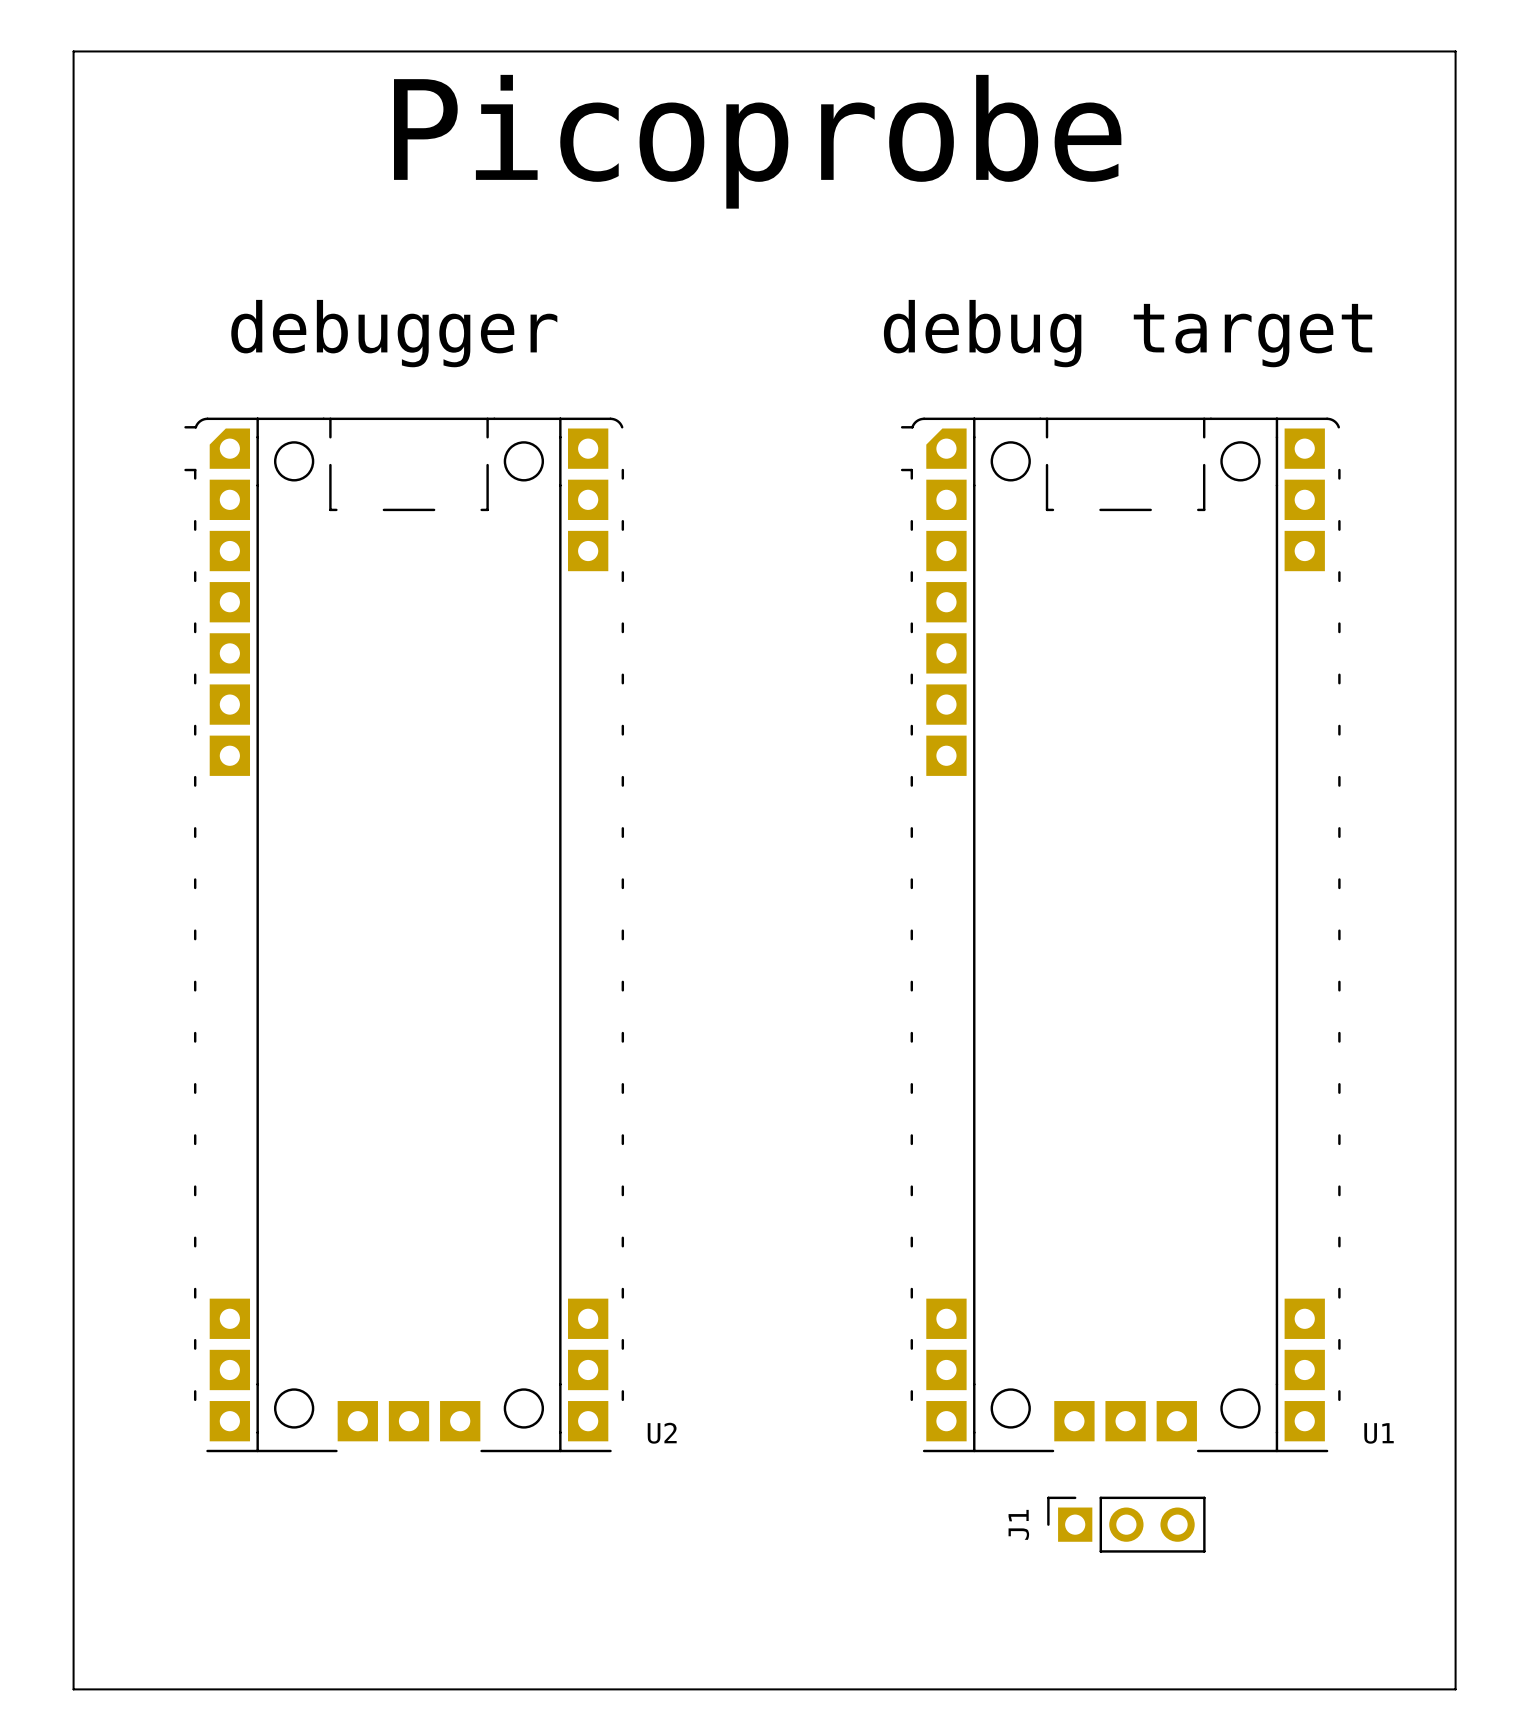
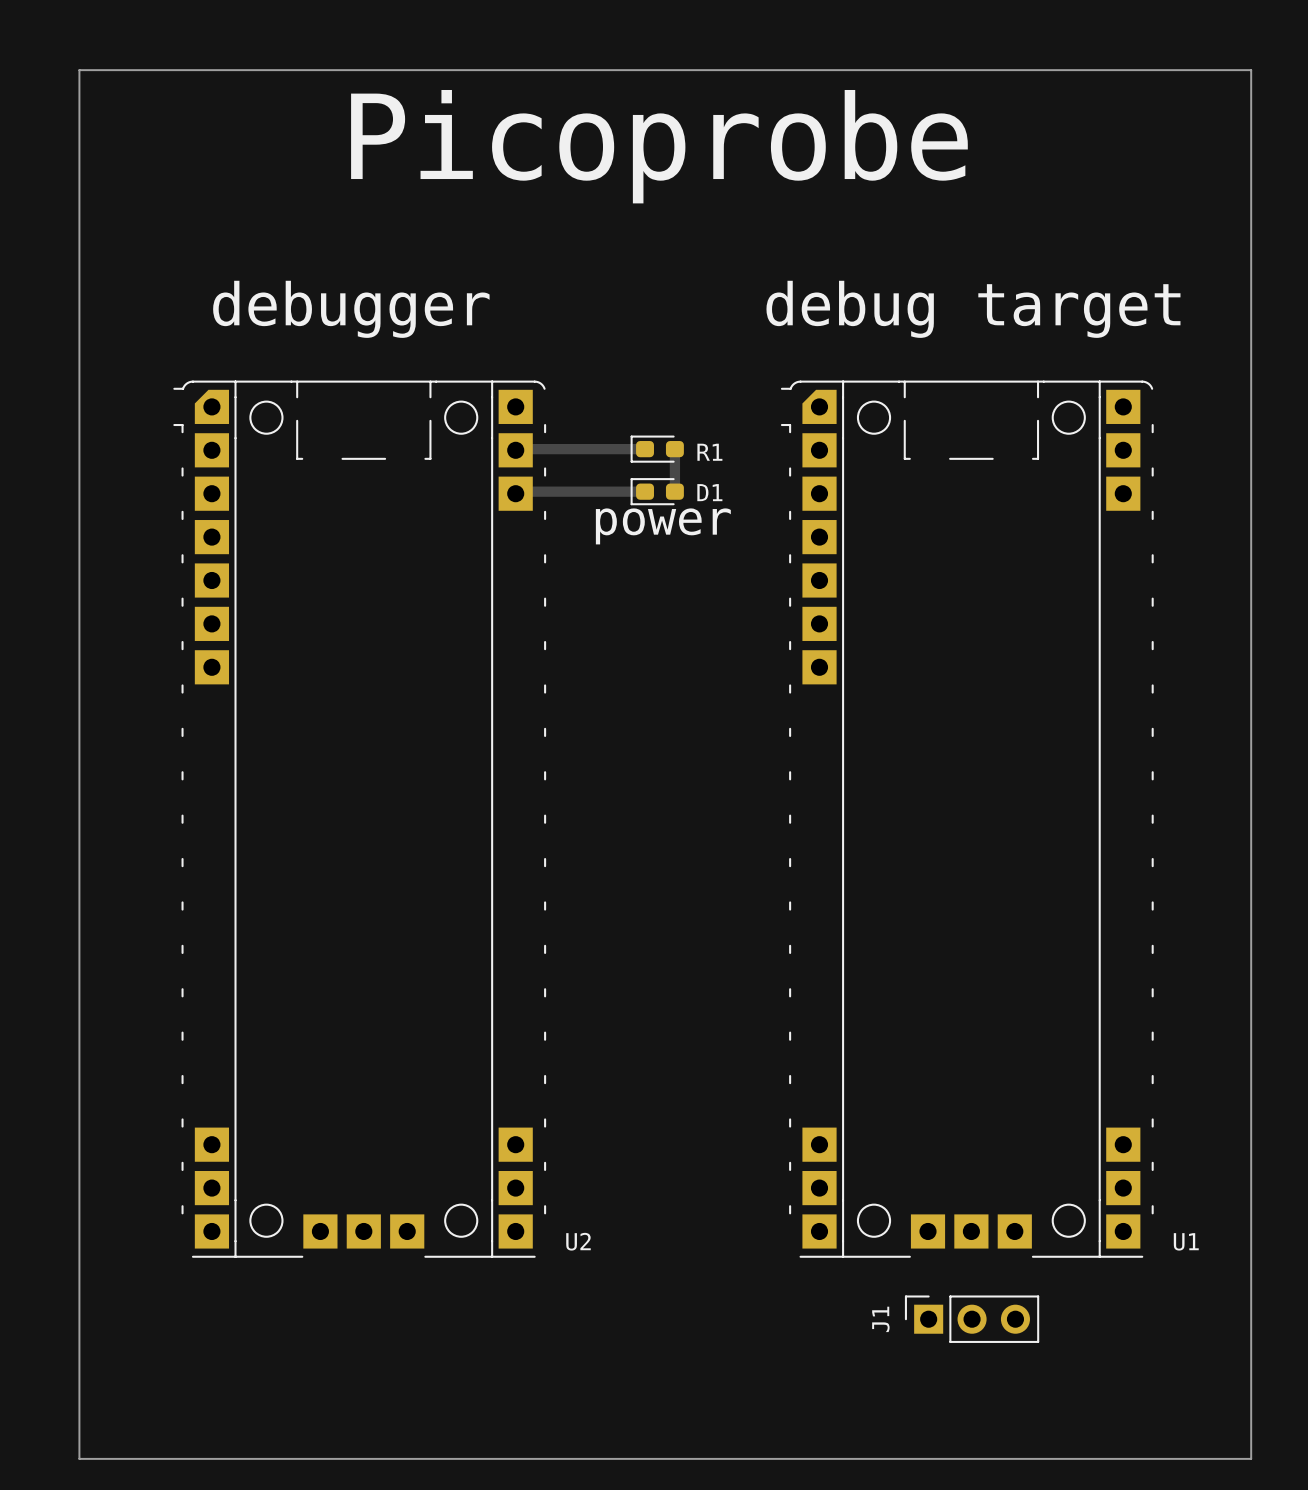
track: none -> (645, 449) (515, 450)
R1: none -> (657, 449)
track: none -> (674, 449) (674, 491)
track: none -> (645, 491) (517, 491) (515, 493)
D1: none -> (657, 491)
text: none -> power (663, 526)

